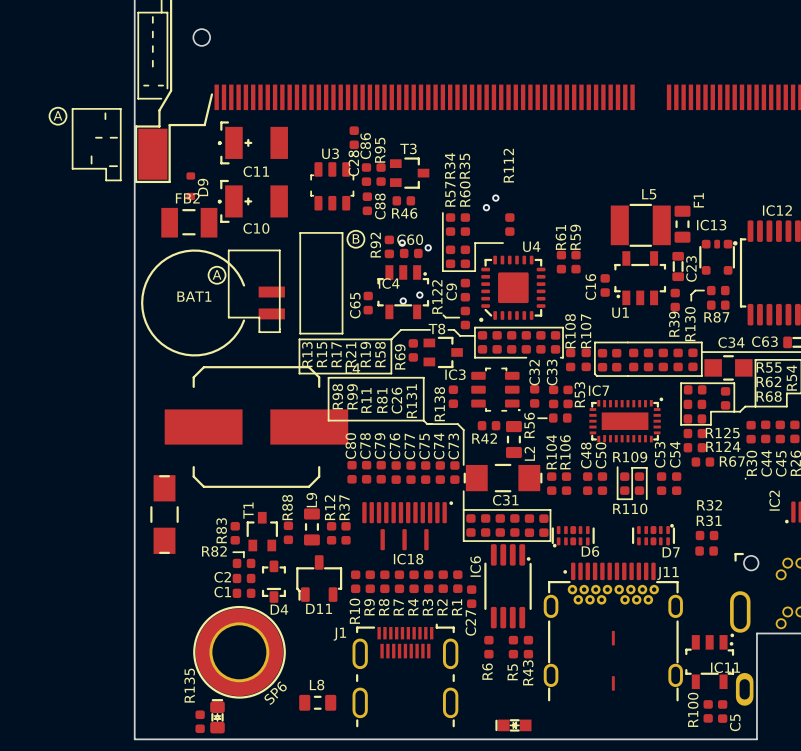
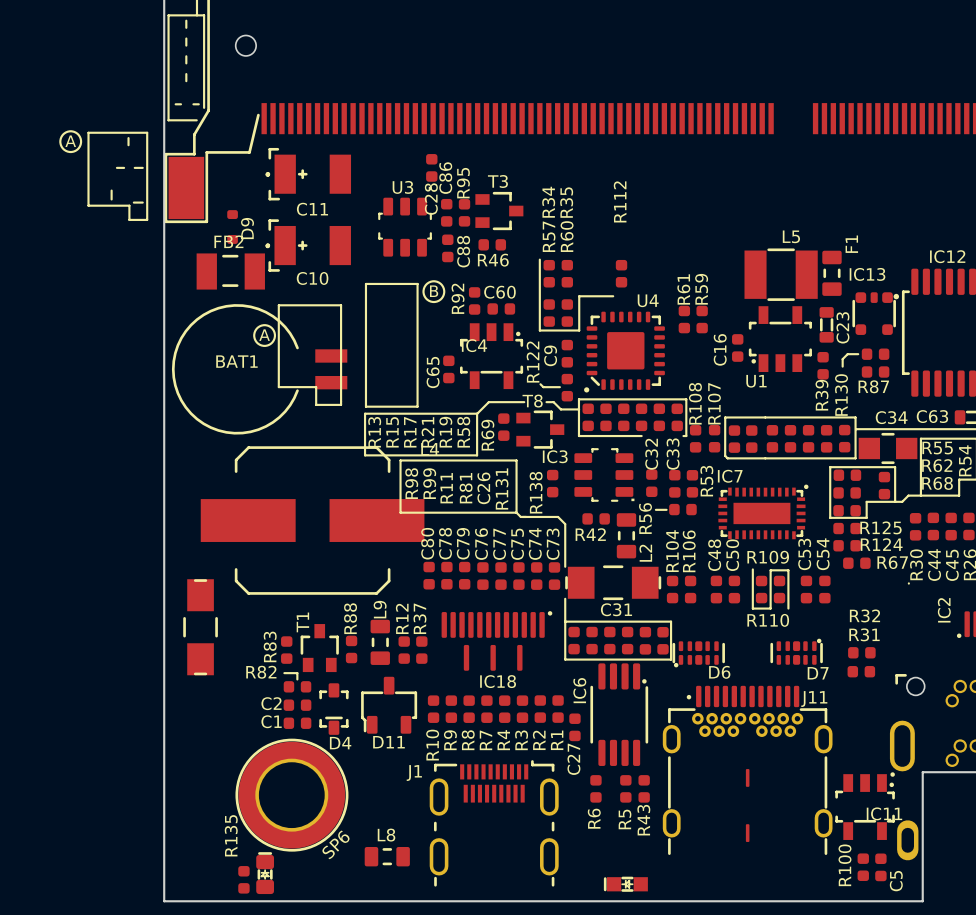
via: (495, 198) -> none
via: (486, 207) -> none
via: (402, 243) -> none
via: (428, 247) -> none
via: (419, 295) -> none
via: (403, 301) -> none

